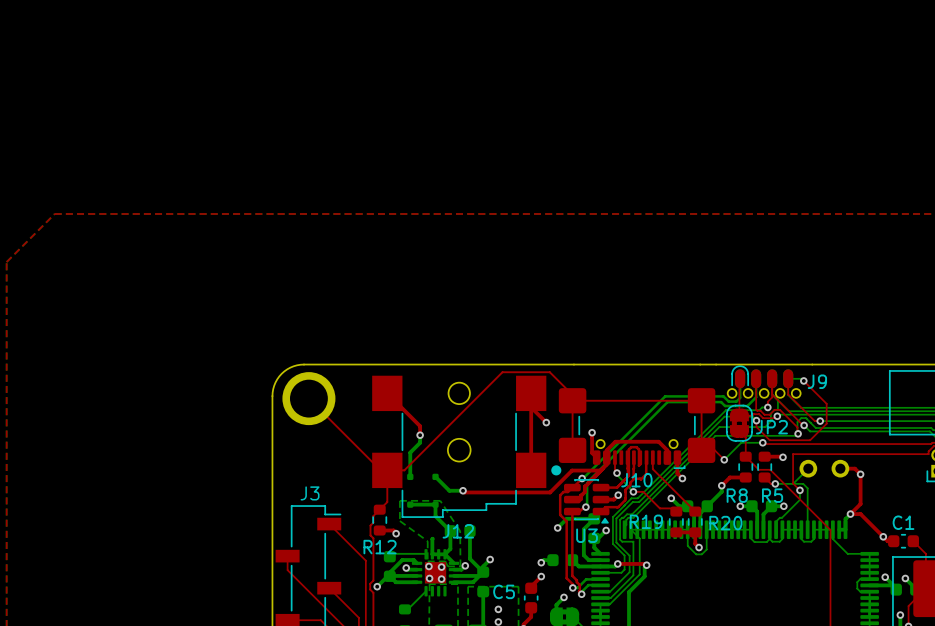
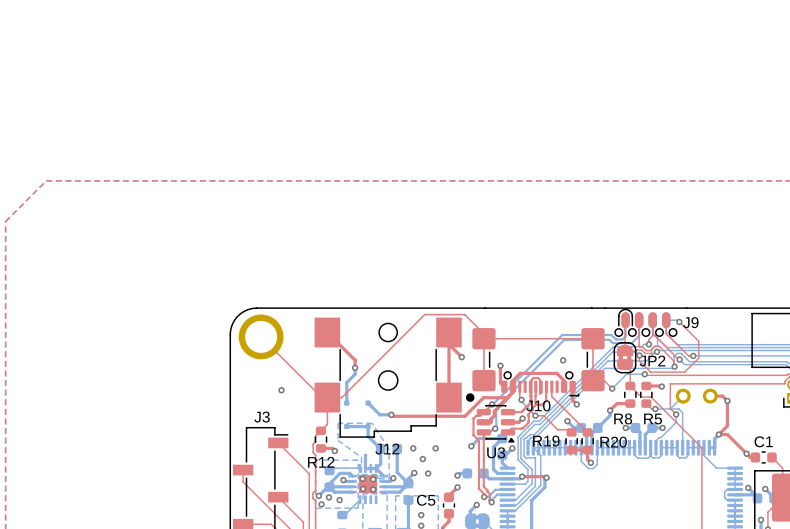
via: none -> (563, 360)
via: none -> (281, 390)
via: none -> (413, 448)
via: none -> (435, 448)
via: none -> (422, 459)
bottom zone outline: none -> (315, 460) (315, 508) (358, 508) (358, 460) (315, 460)
via: none -> (428, 473)
via: none -> (328, 497)
via: none -> (339, 500)
via: none -> (321, 504)

